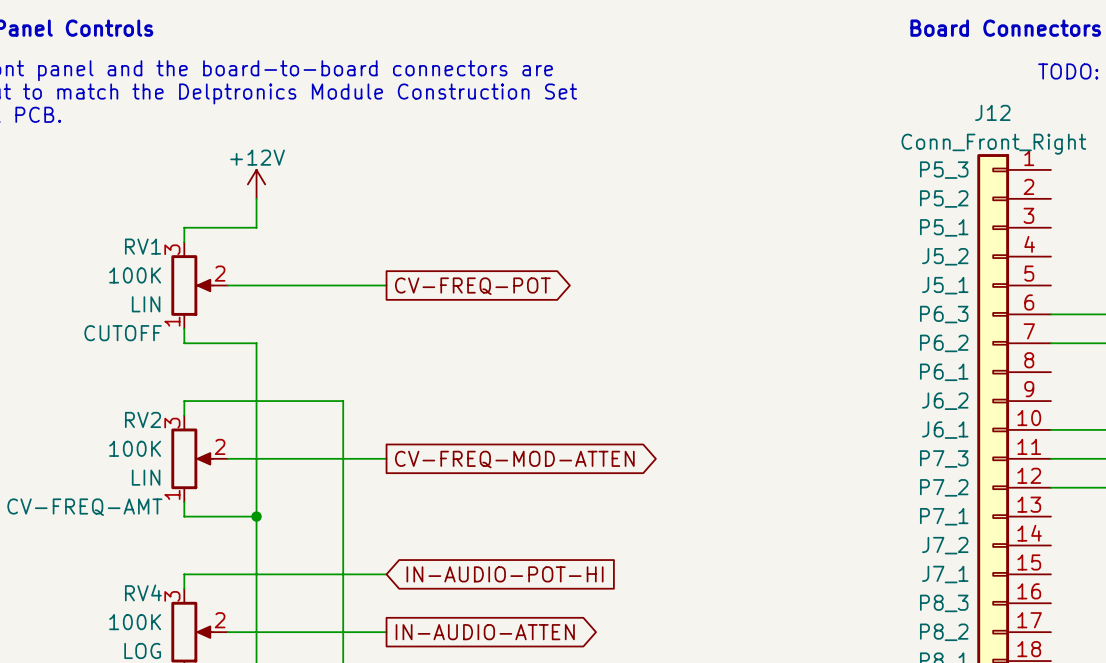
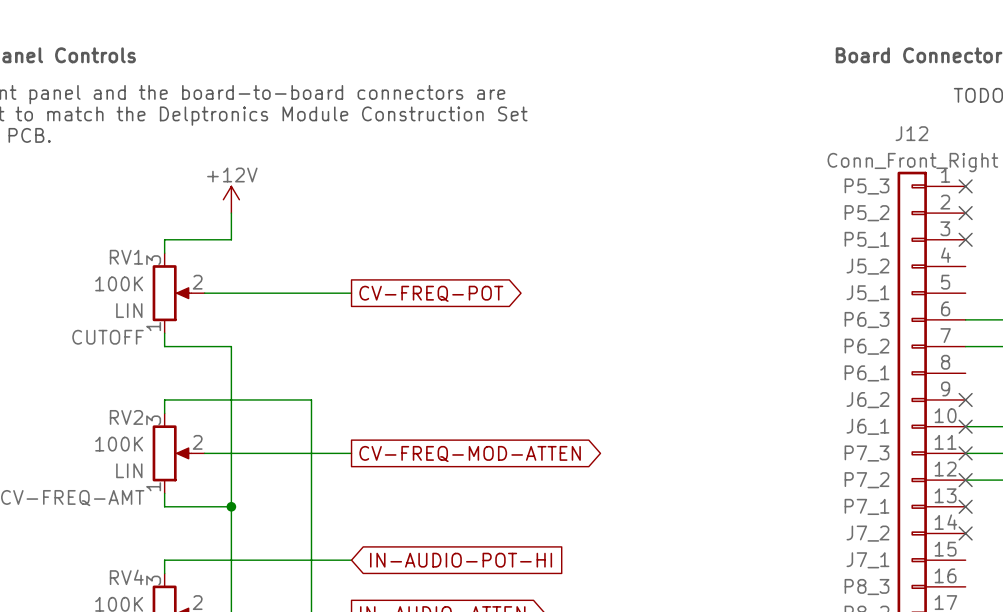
no-connect mark: none -> (965, 186)
no-connect mark: none -> (965, 213)
no-connect mark: none -> (965, 239)
no-connect mark: none -> (965, 399)
no-connect mark: none -> (965, 426)
no-connect mark: none -> (965, 453)
no-connect mark: none -> (965, 480)
no-connect mark: none -> (965, 506)
no-connect mark: none -> (965, 533)

